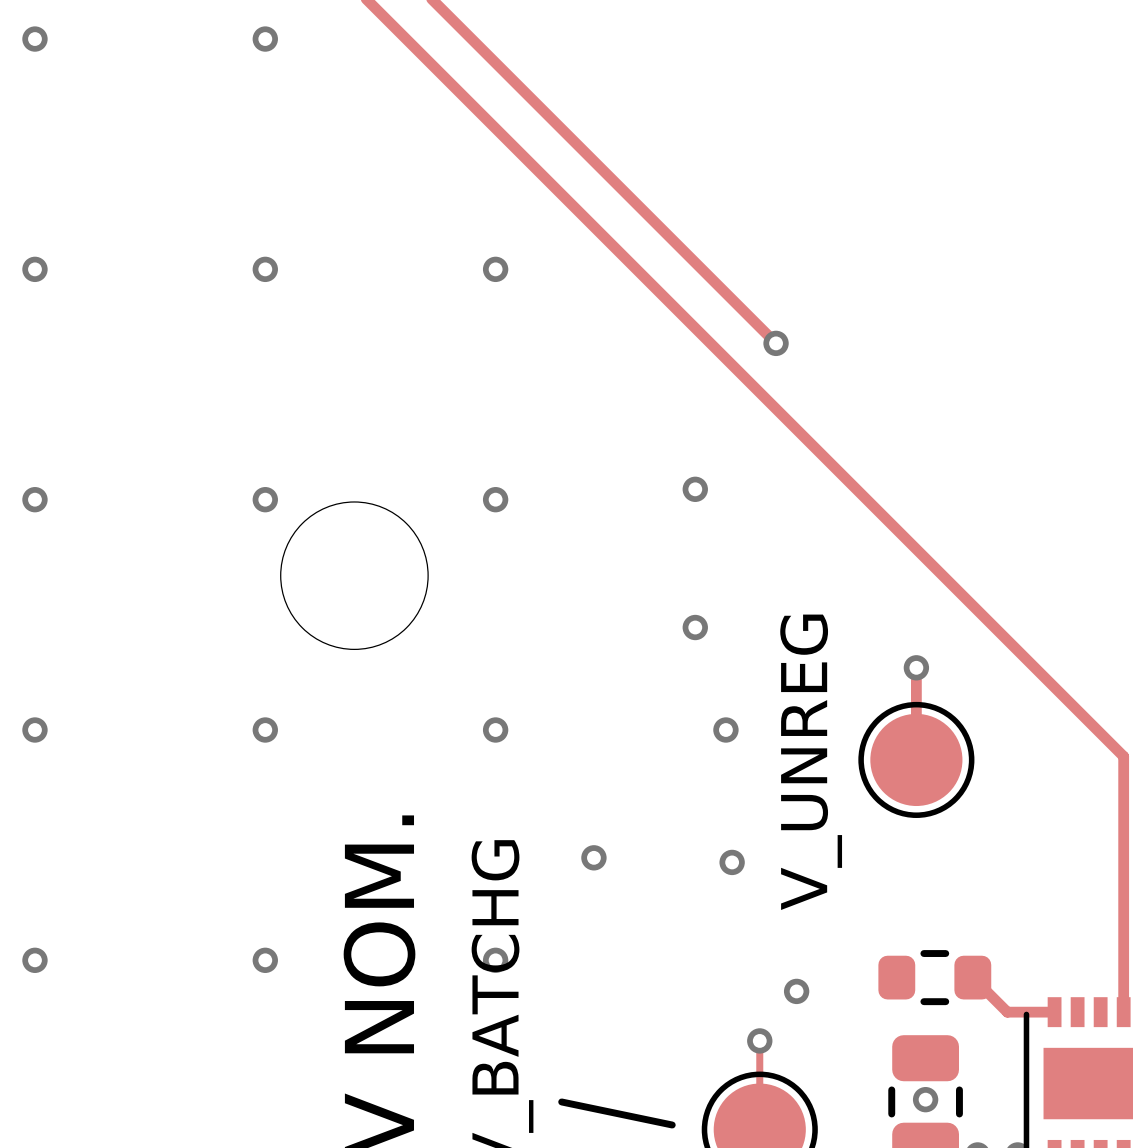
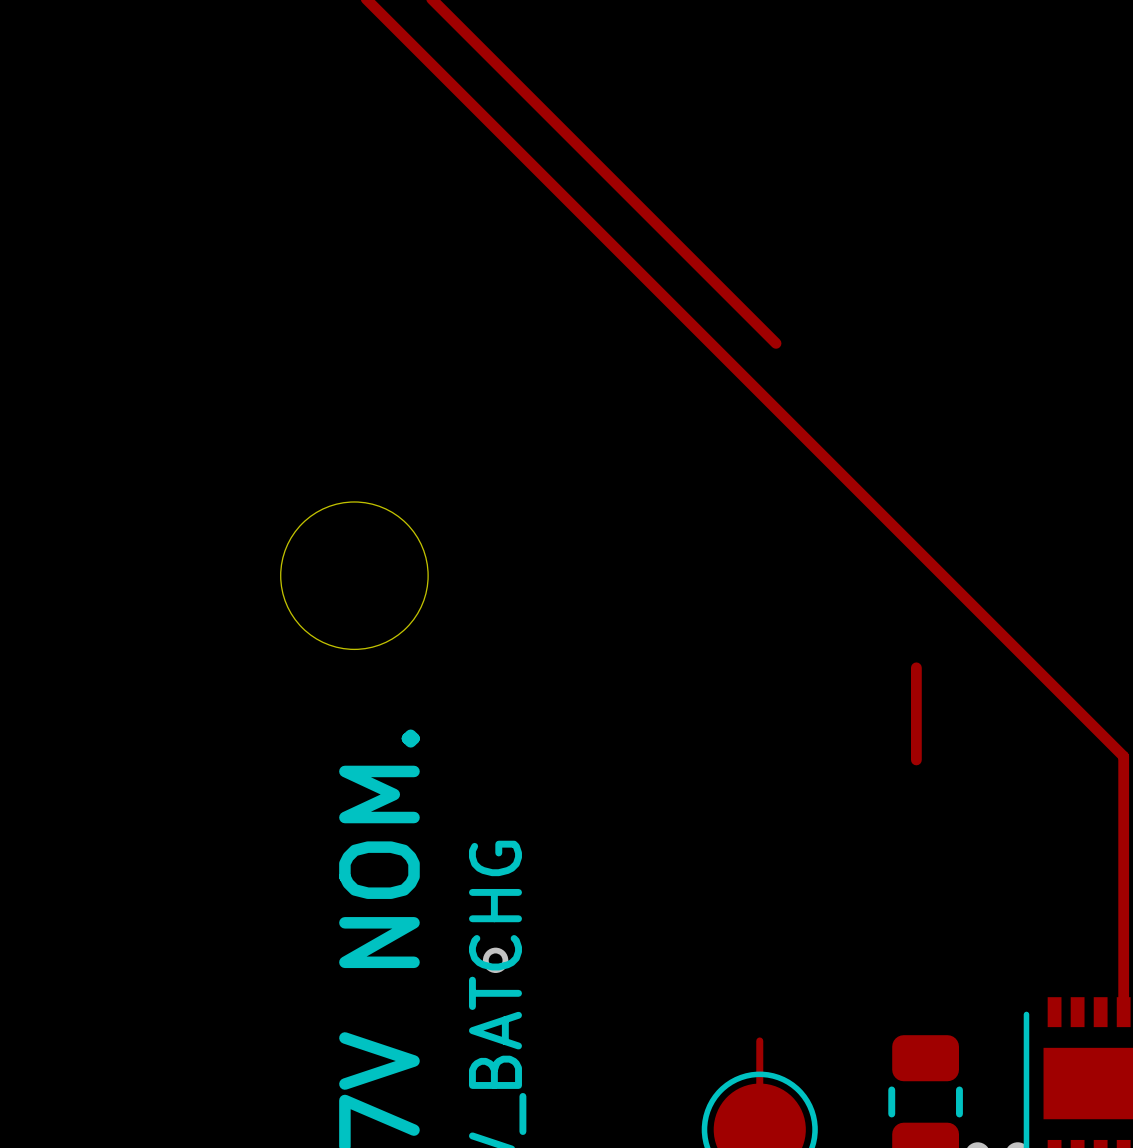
via: (34, 39) -> none
via: (265, 39) -> none
via: (34, 269) -> none
via: (265, 269) -> none
via: (495, 269) -> none
via: (776, 343) -> none
via: (695, 489) -> none
via: (34, 499) -> none
via: (265, 499) -> none
via: (495, 499) -> none
via: (695, 627) -> none
via: (916, 667) -> none
via: (34, 730) -> none
via: (265, 730) -> none
via: (495, 730) -> none
via: (725, 730) -> none
part: V_UNREG (916, 759) -> none
via: (593, 857) -> none
via: (732, 862) -> none
via: (34, 960) -> none
via: (265, 960) -> none
part: (934, 977) -> none
track: (972, 977) (1007, 1012) (1054, 1012) -> none
via: (796, 991) -> none
via: (759, 1040) -> none
via: (925, 1099) -> none
line: (561, 1101) (672, 1125) -> none

